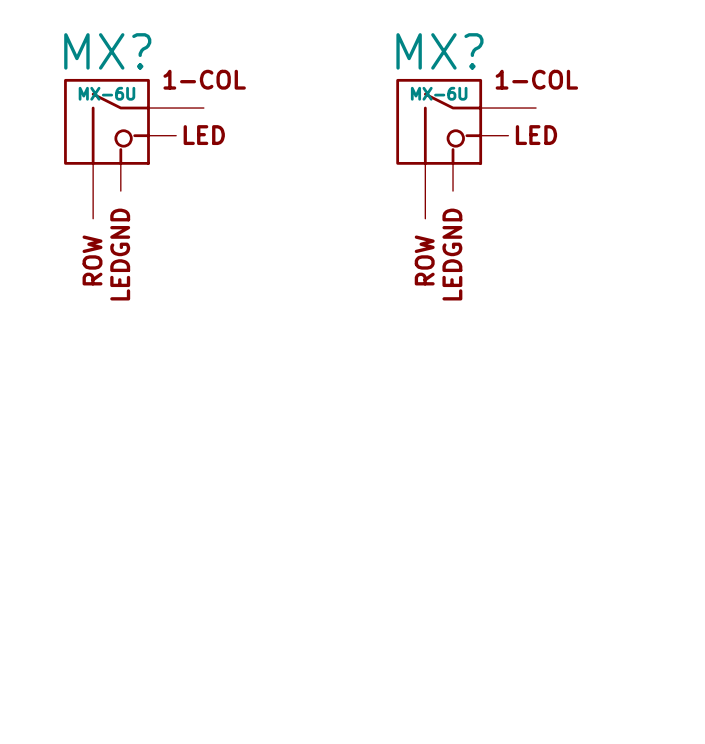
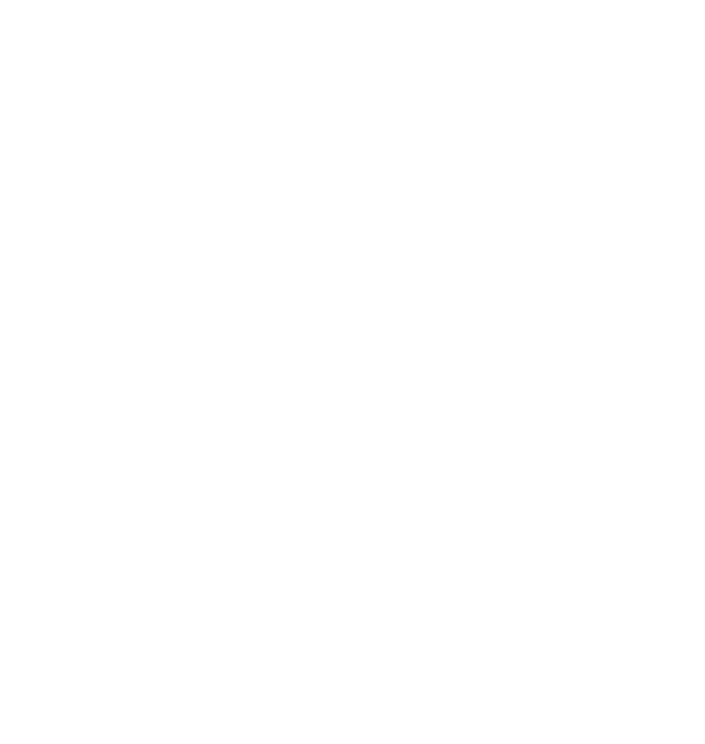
MX?: MX-6U (133, 148) -> none
MX?: MX-6U (466, 148) -> none

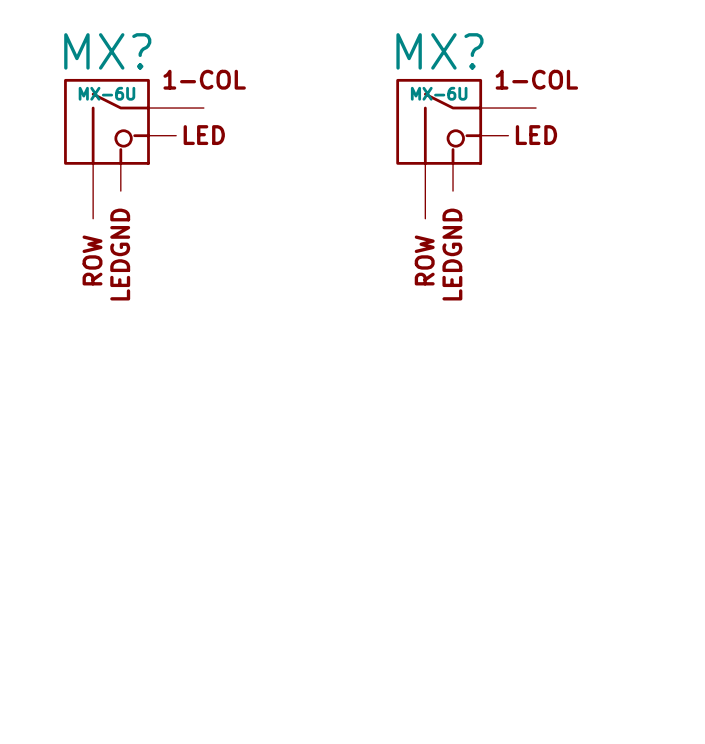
MX?: none -> MX-6U (133, 148)
MX?: none -> MX-6U (466, 148)

